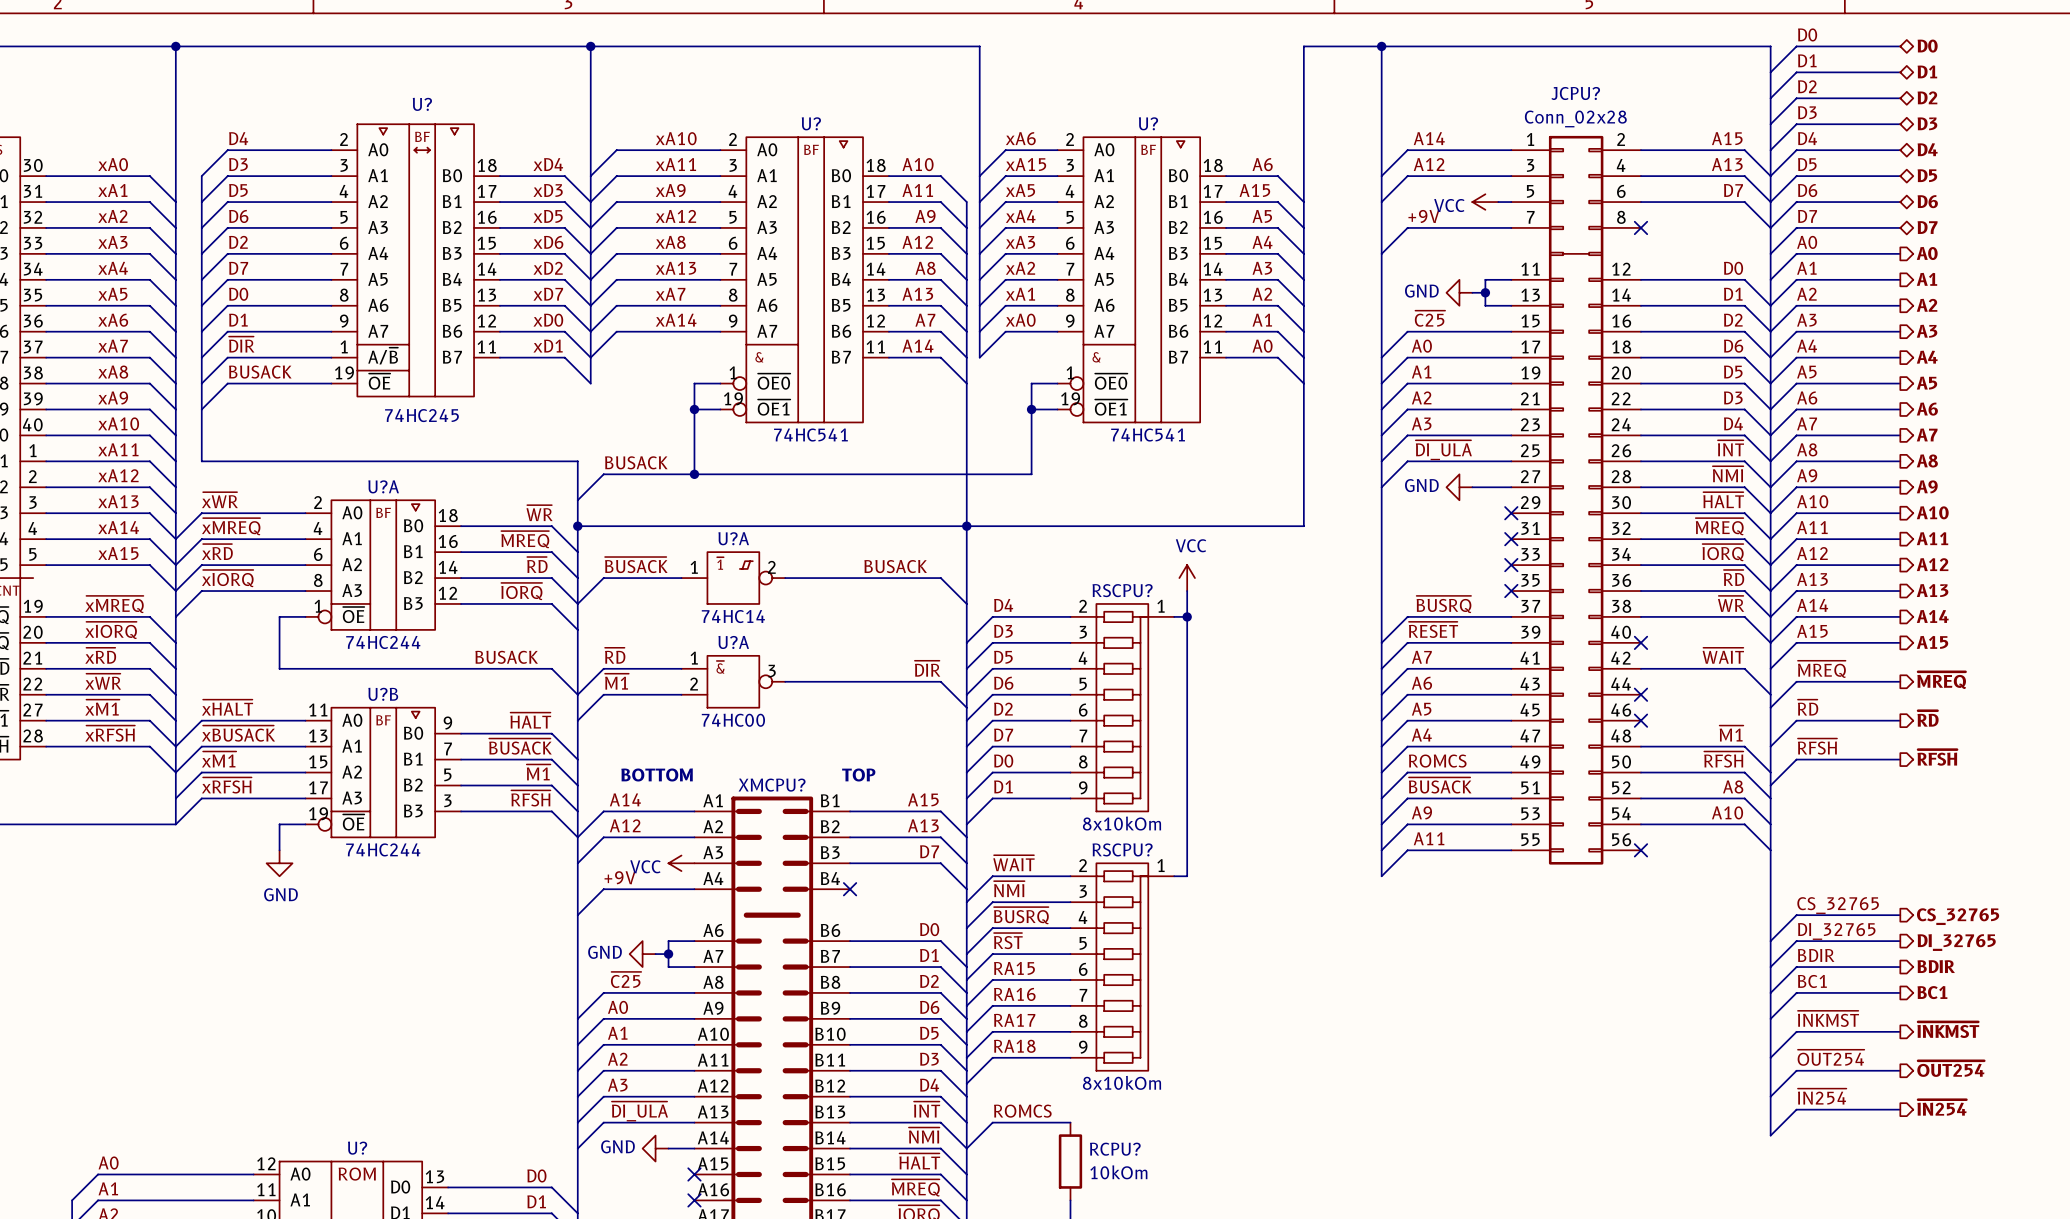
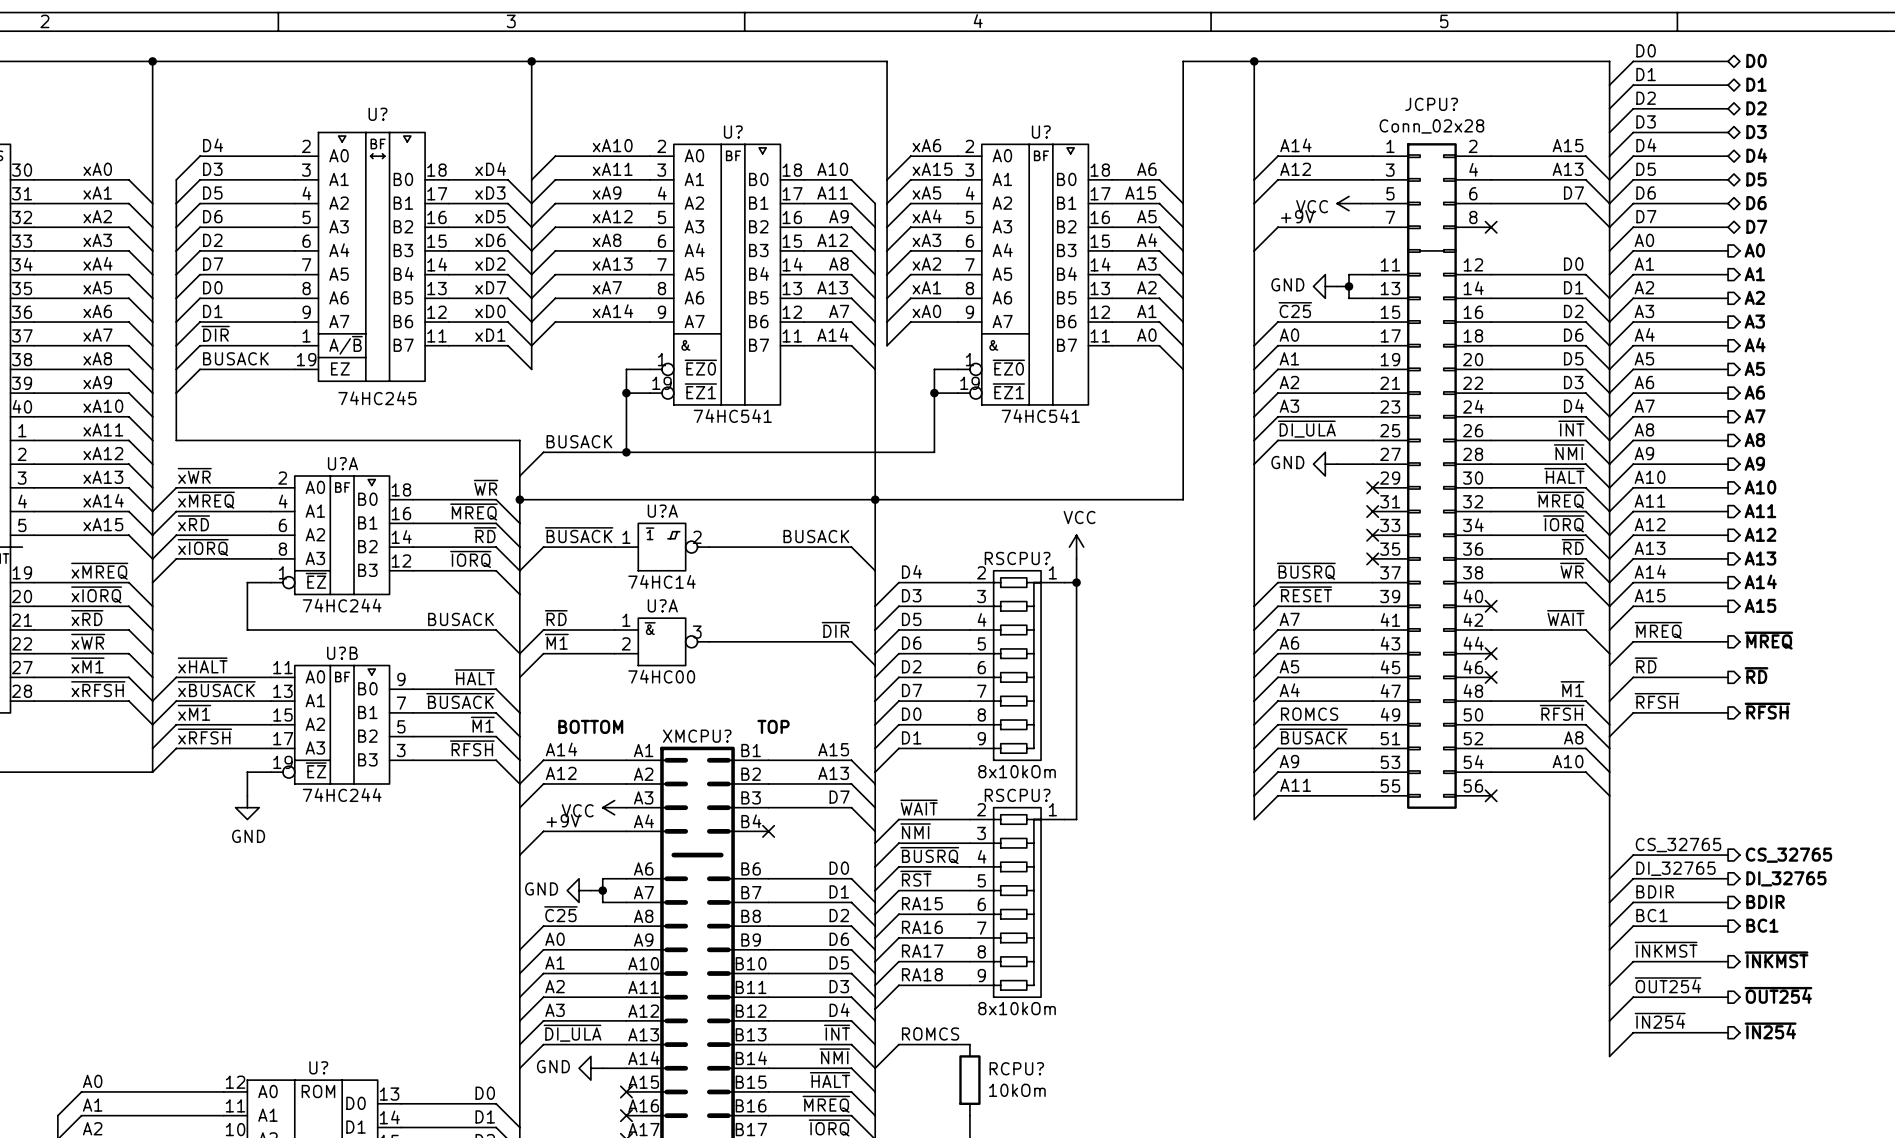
U? pin name: ~{OE} (379, 381) -> EZ (340, 368)
U? pin name: ~{OE0} (774, 381) -> ~{EZ0} (700, 367)
U? pin name: ~{OE0} (1111, 381) -> ~{EZ0} (1008, 367)
U? pin name: ~{OE1} (774, 407) -> ~{EZ1} (700, 391)
U? pin name: ~{OE1} (1111, 407) -> ~{EZ1} (1008, 391)
U?A pin name: ~{OE} (353, 615) -> ~{EZ} (316, 580)
U?B pin name: ~{OE} (353, 822) -> ~{EZ} (316, 770)

